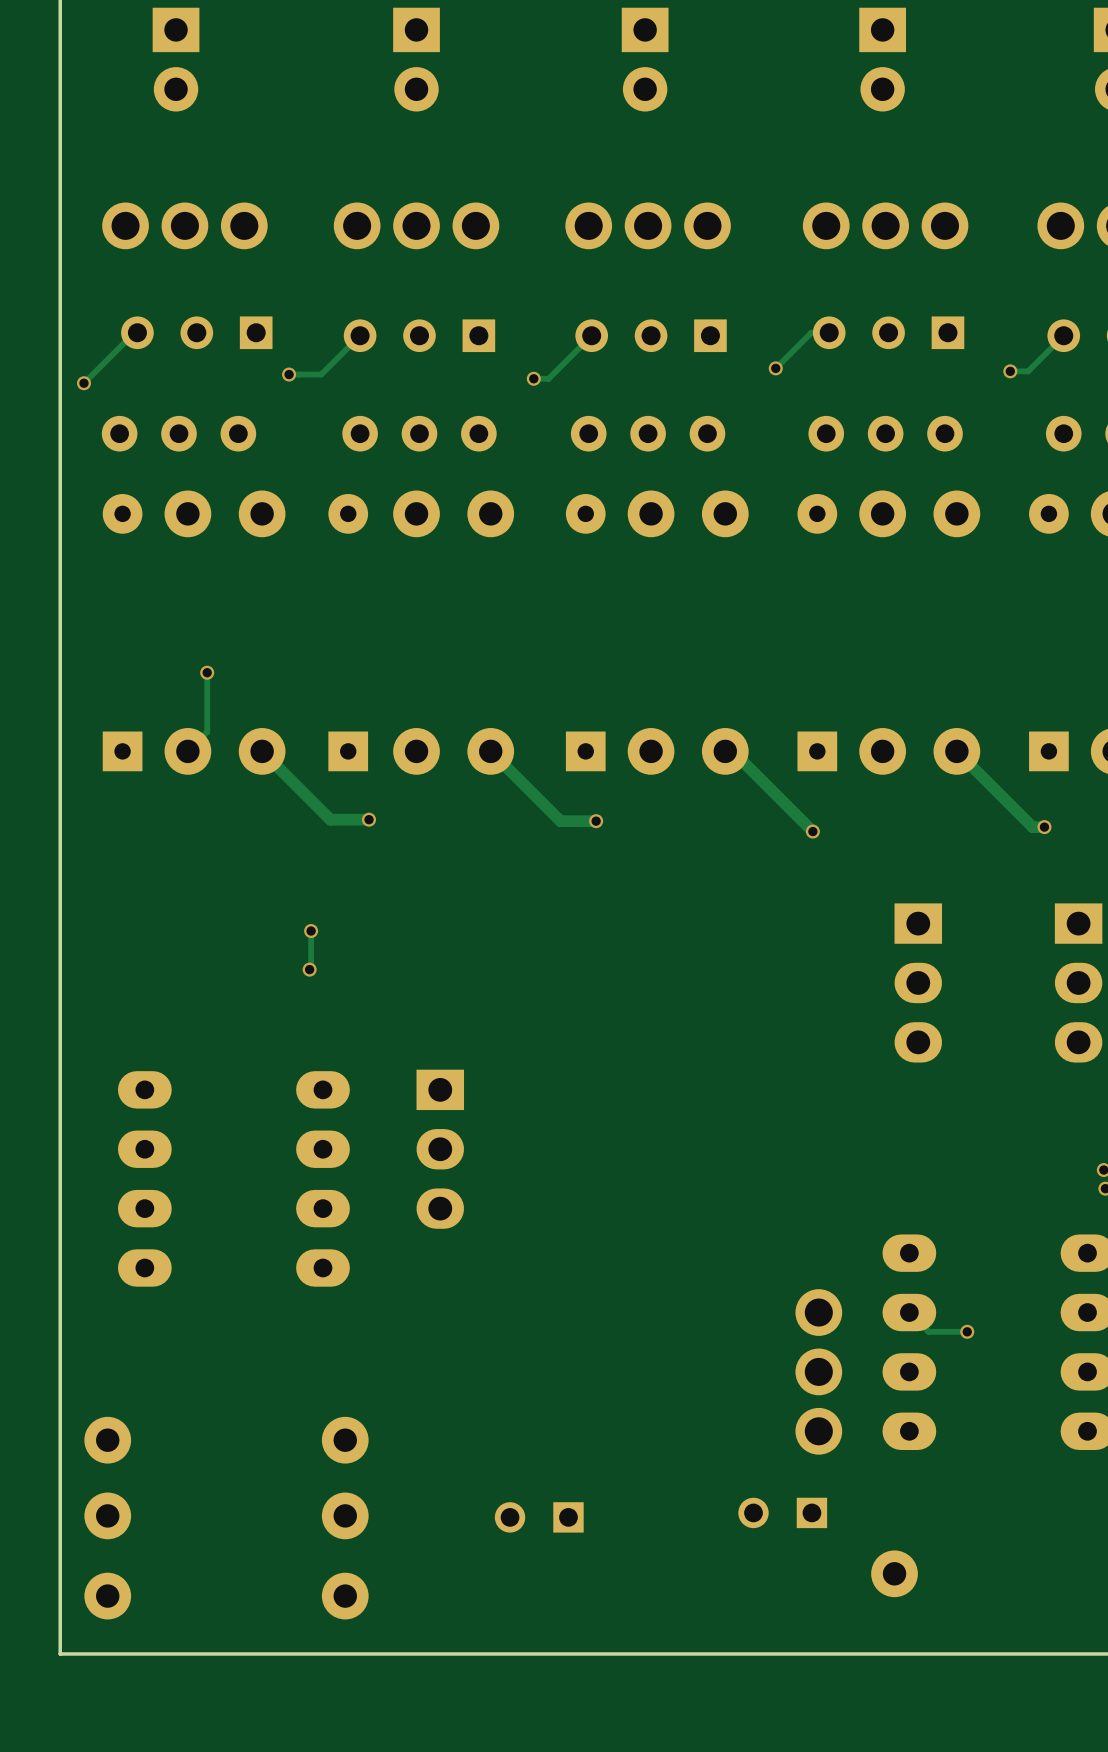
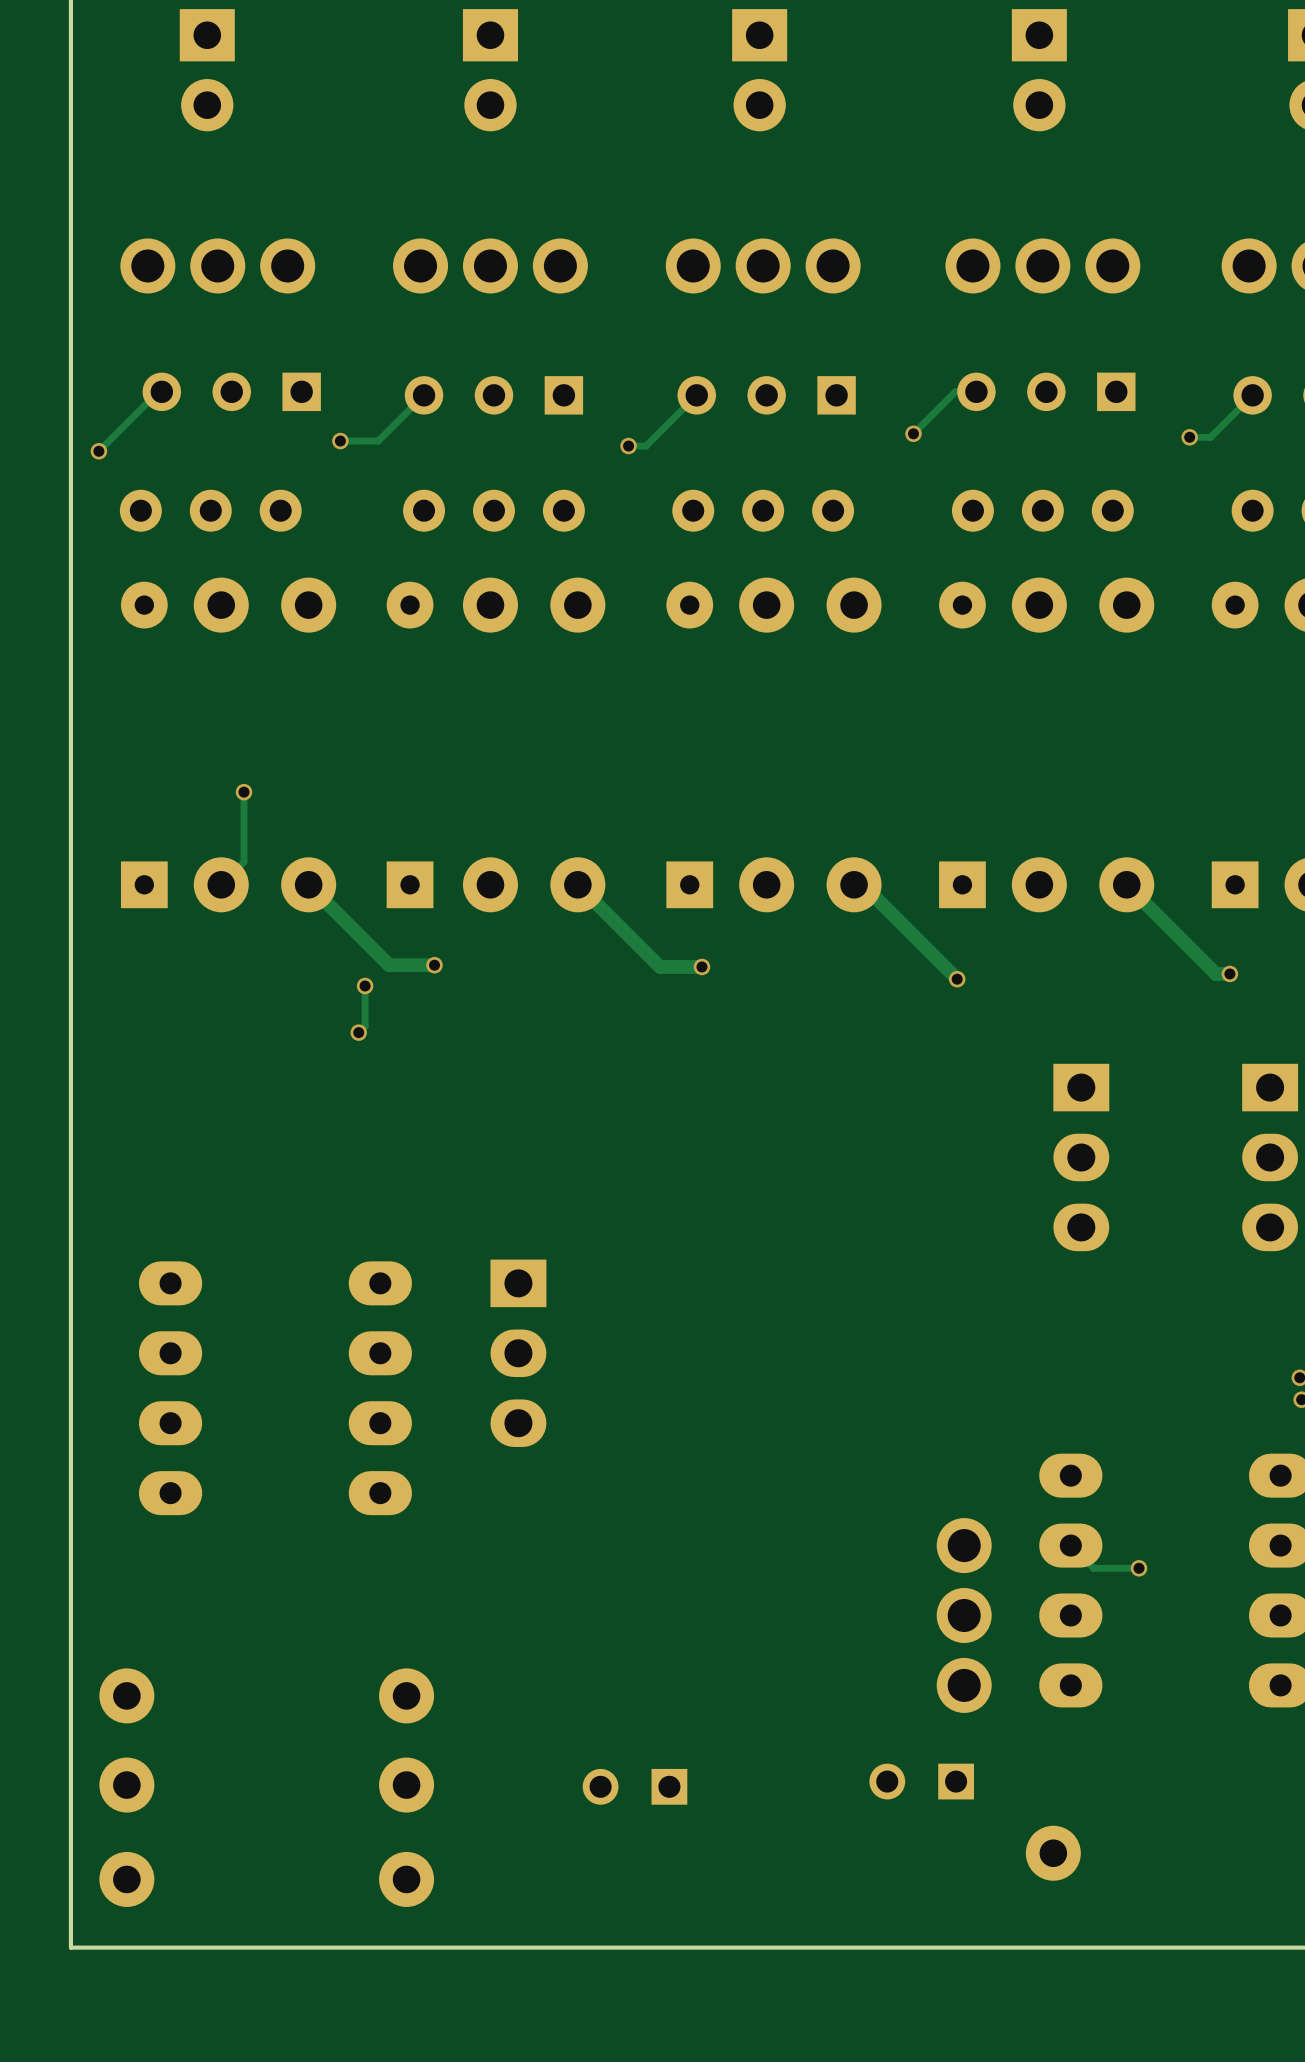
track: none -> (365, 985) (365, 1026) (358, 1032)
via: none -> (365, 985)
via: none -> (358, 1032)
track: (311, 931) (309, 969) -> none
via: (311, 931) -> none
via: (309, 969) -> none

